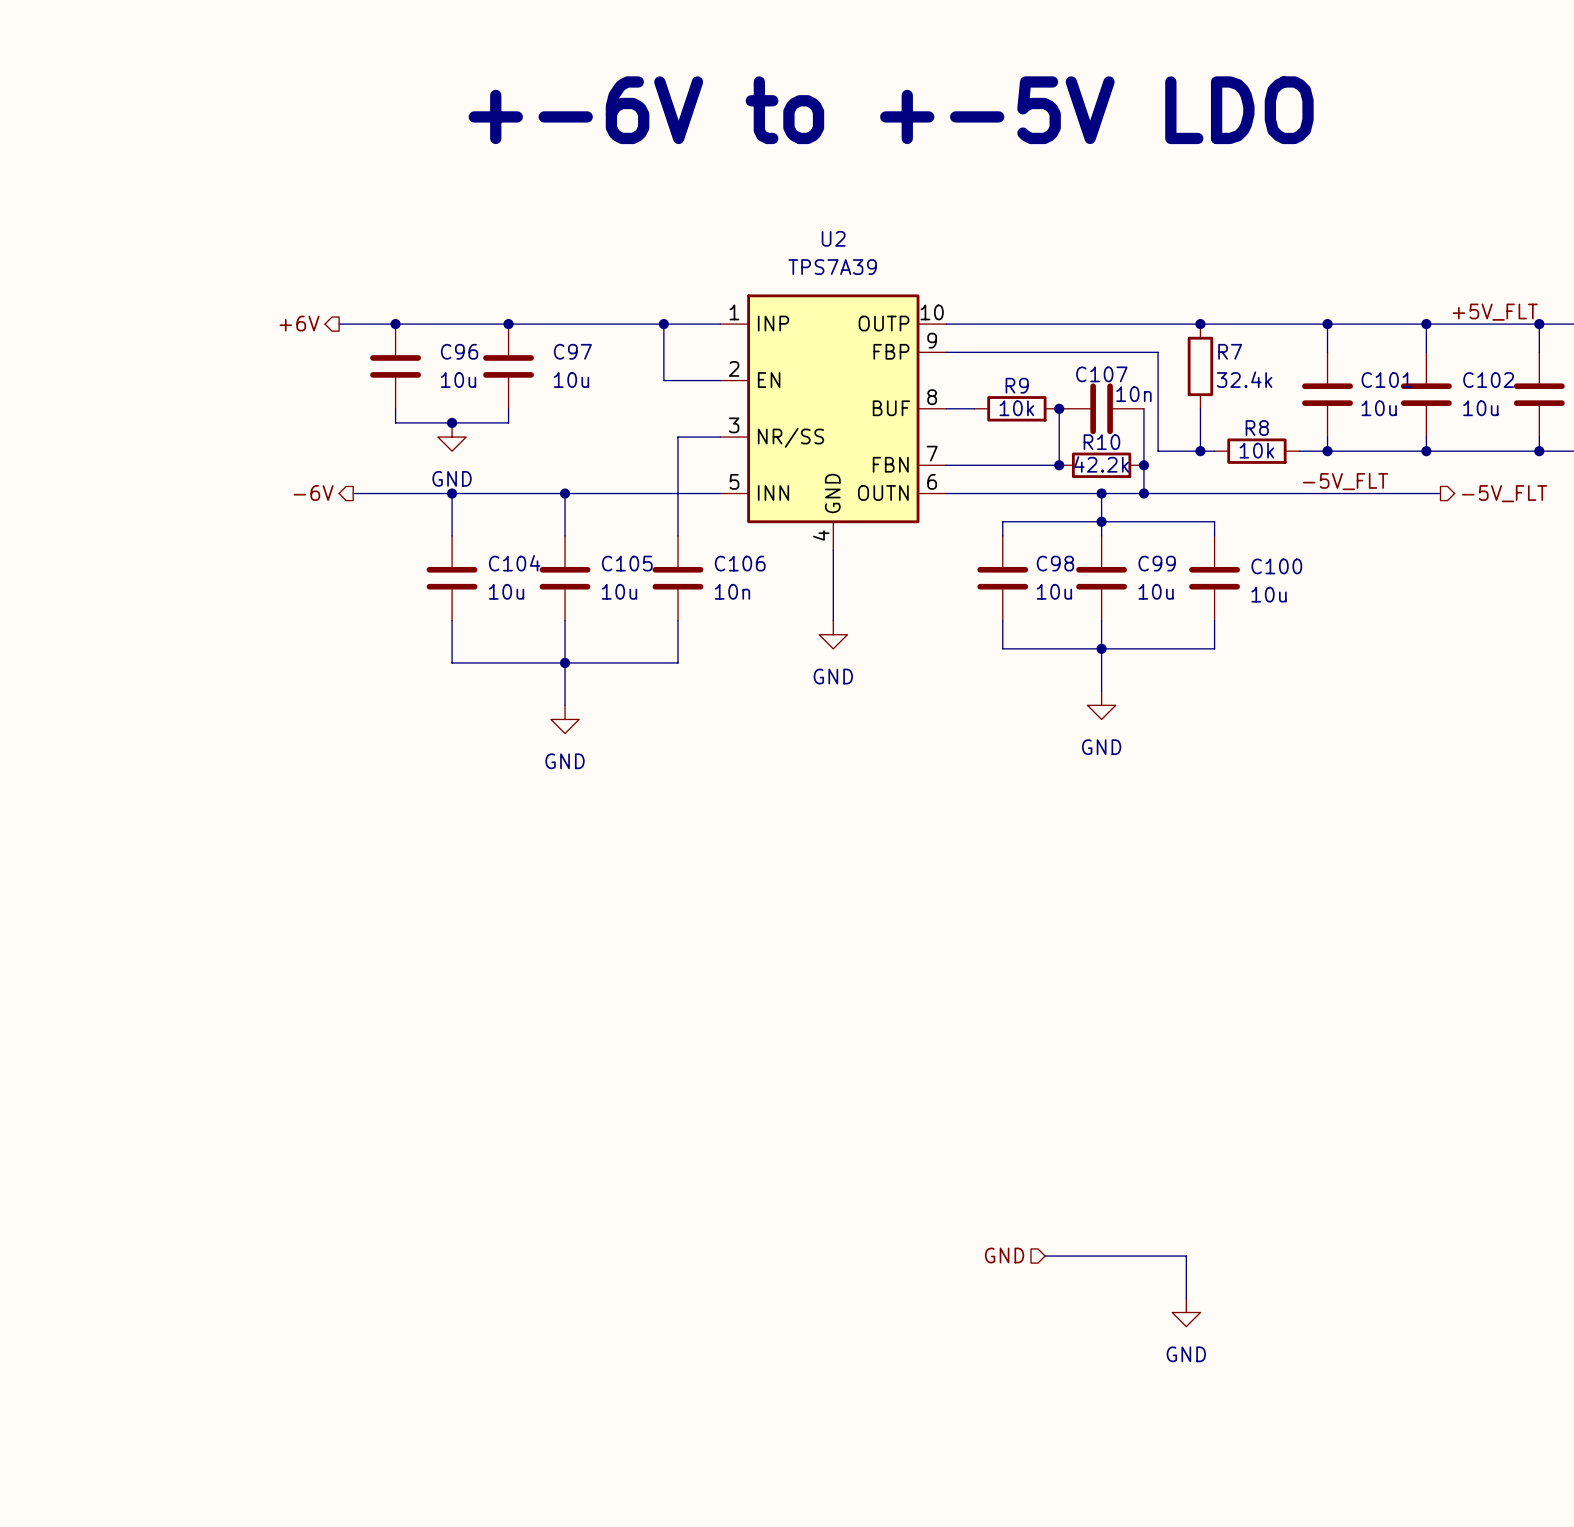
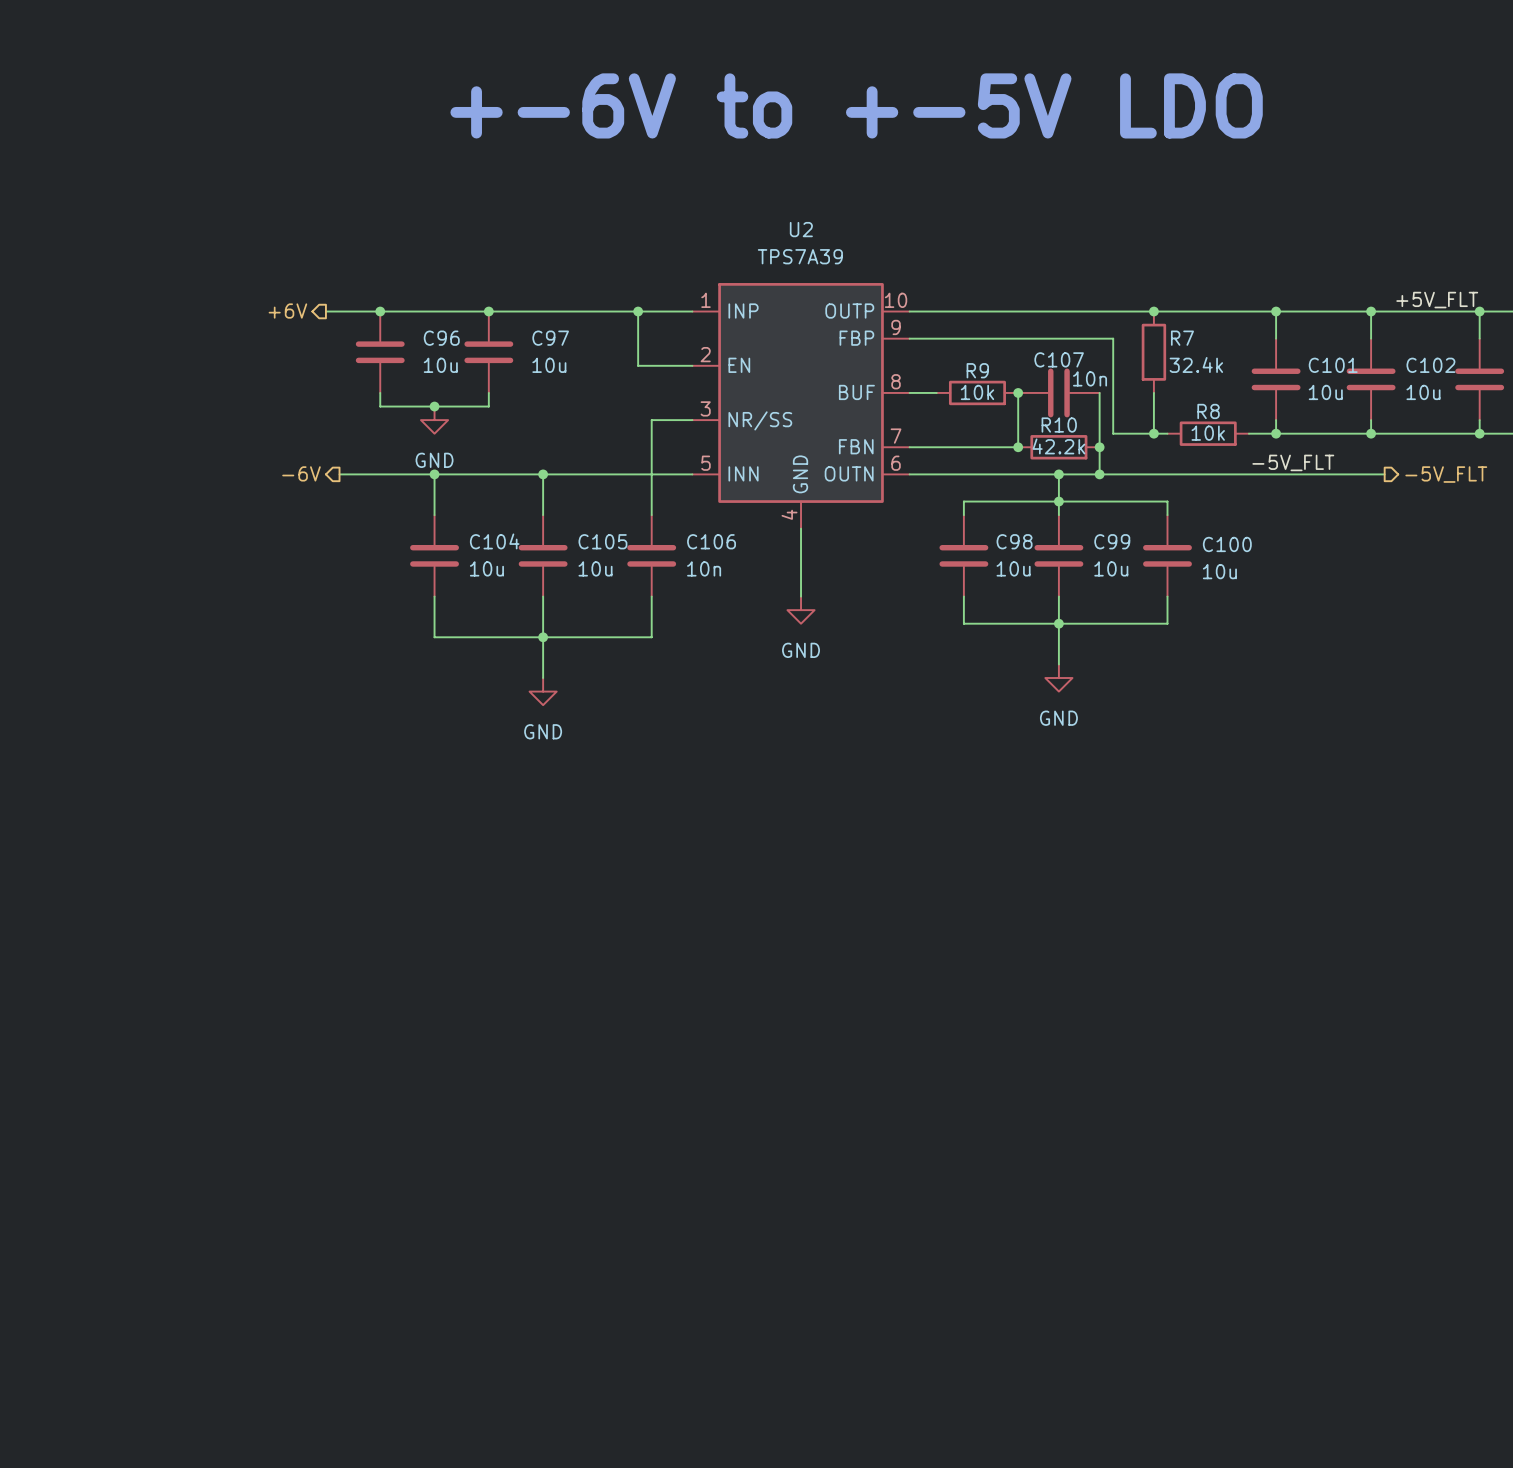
hierarchical label: GND (1004, 1255) -> none
wire: (1045, 1256) (1186, 1256) (1186, 1298) -> none
power symbol: GND (1186, 1312) -> none

